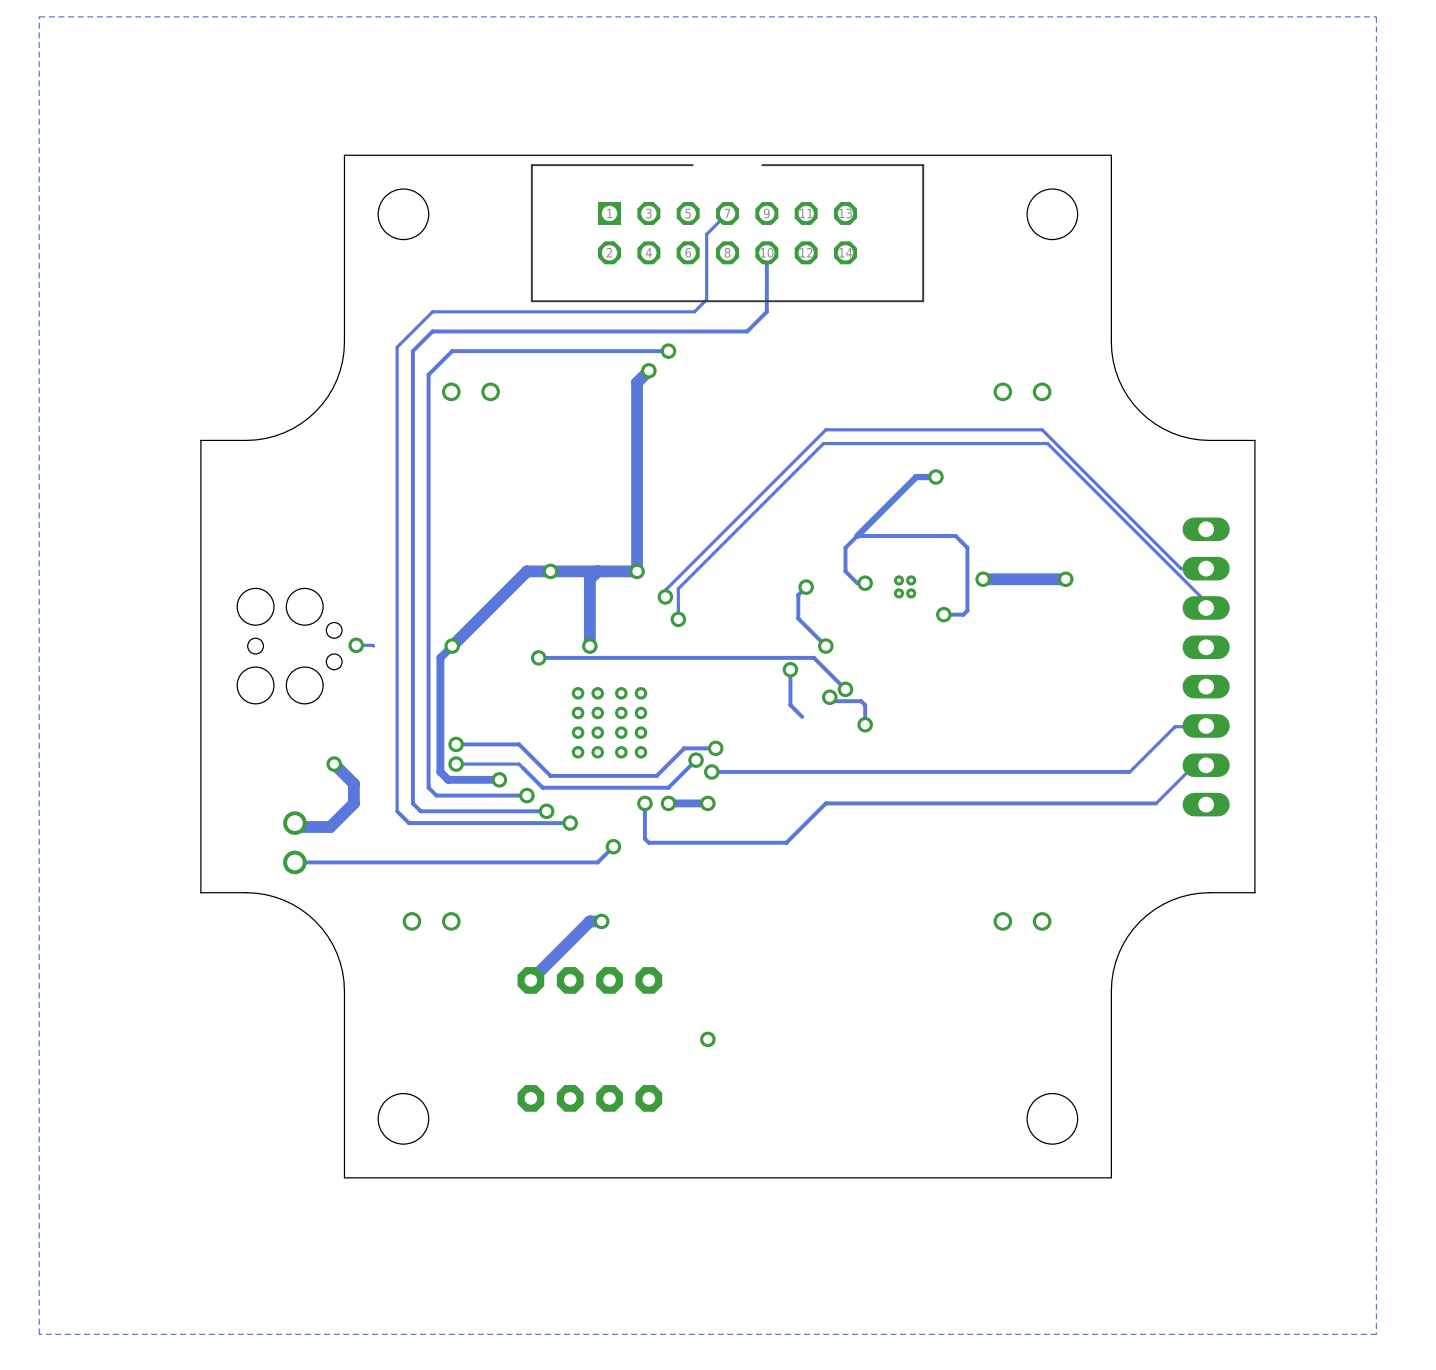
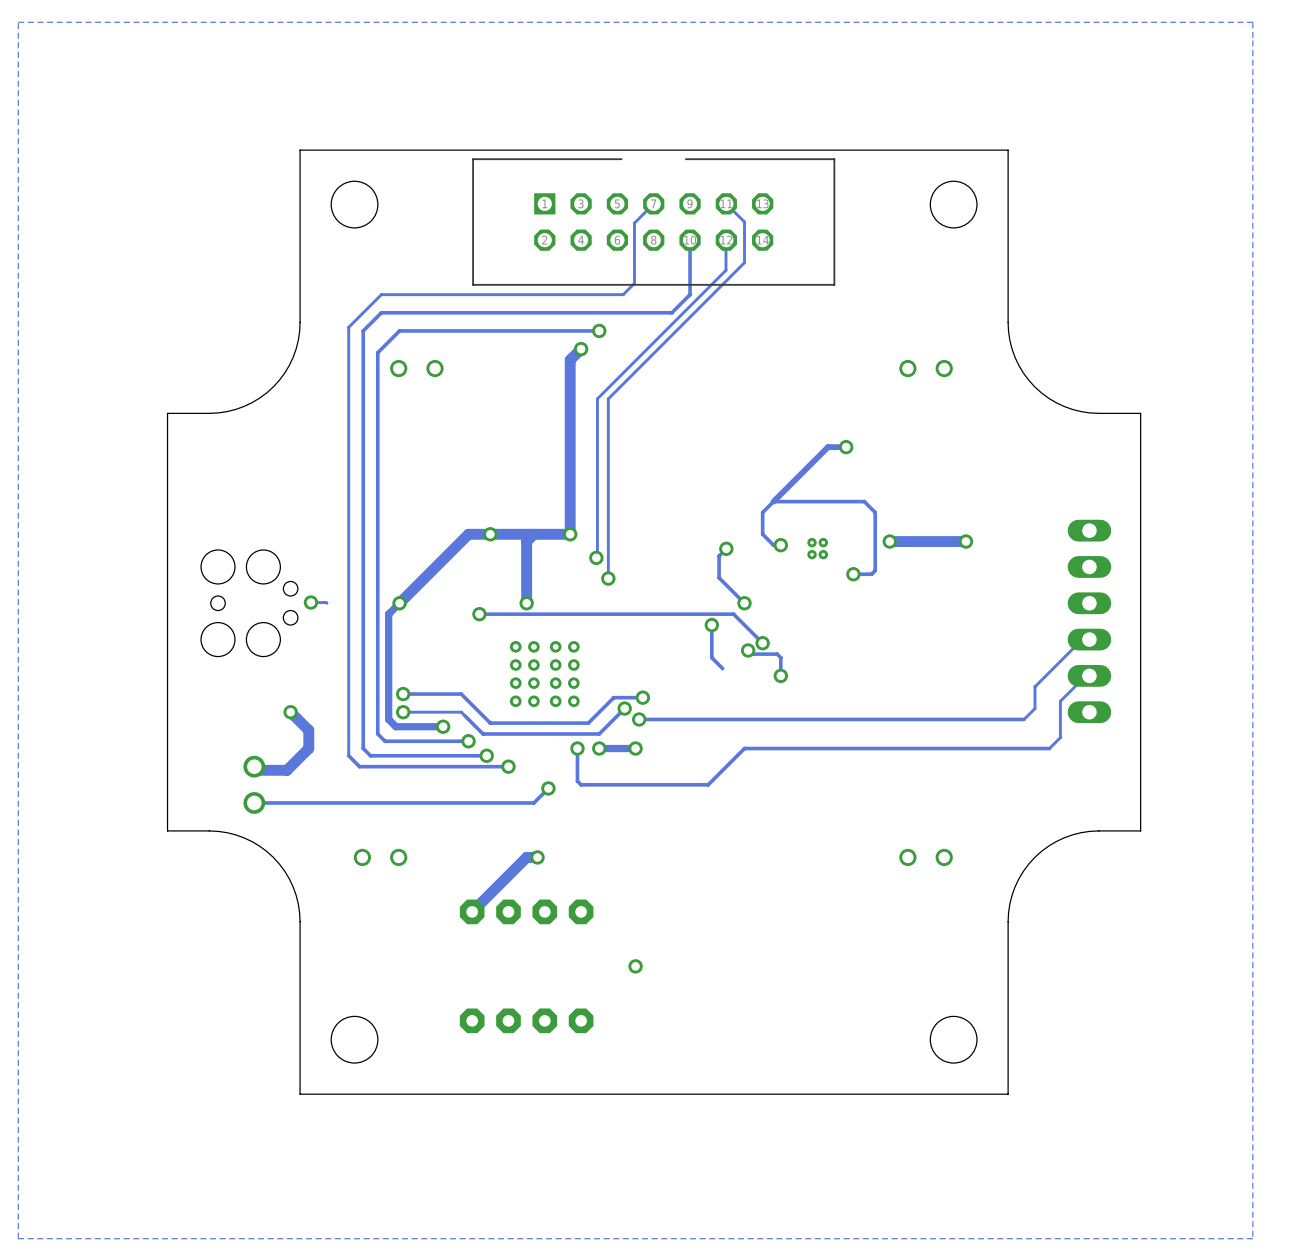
track: none -> (726, 240) (725, 270) (597, 398) (597, 556)
part footprint: [1182, 517, 1230, 817] -> [1067, 519, 1112, 724]
track: (1206, 568) (1180, 568) (1042, 429) (825, 429) (665, 590) (665, 596) -> none
track: (678, 588) (823, 443) (1047, 443) (1206, 602) (1206, 607) -> (608, 550) (608, 398) (744, 262) (744, 222) (726, 203)
track: (1206, 725) (1175, 726) (1128, 771) -> (1089, 639) (1082, 639) (1034, 686) (1034, 708) (1024, 719)
track: (1206, 765) (1194, 765) (1167, 791) -> (1089, 675) (1085, 675) (1060, 701) (1060, 737)

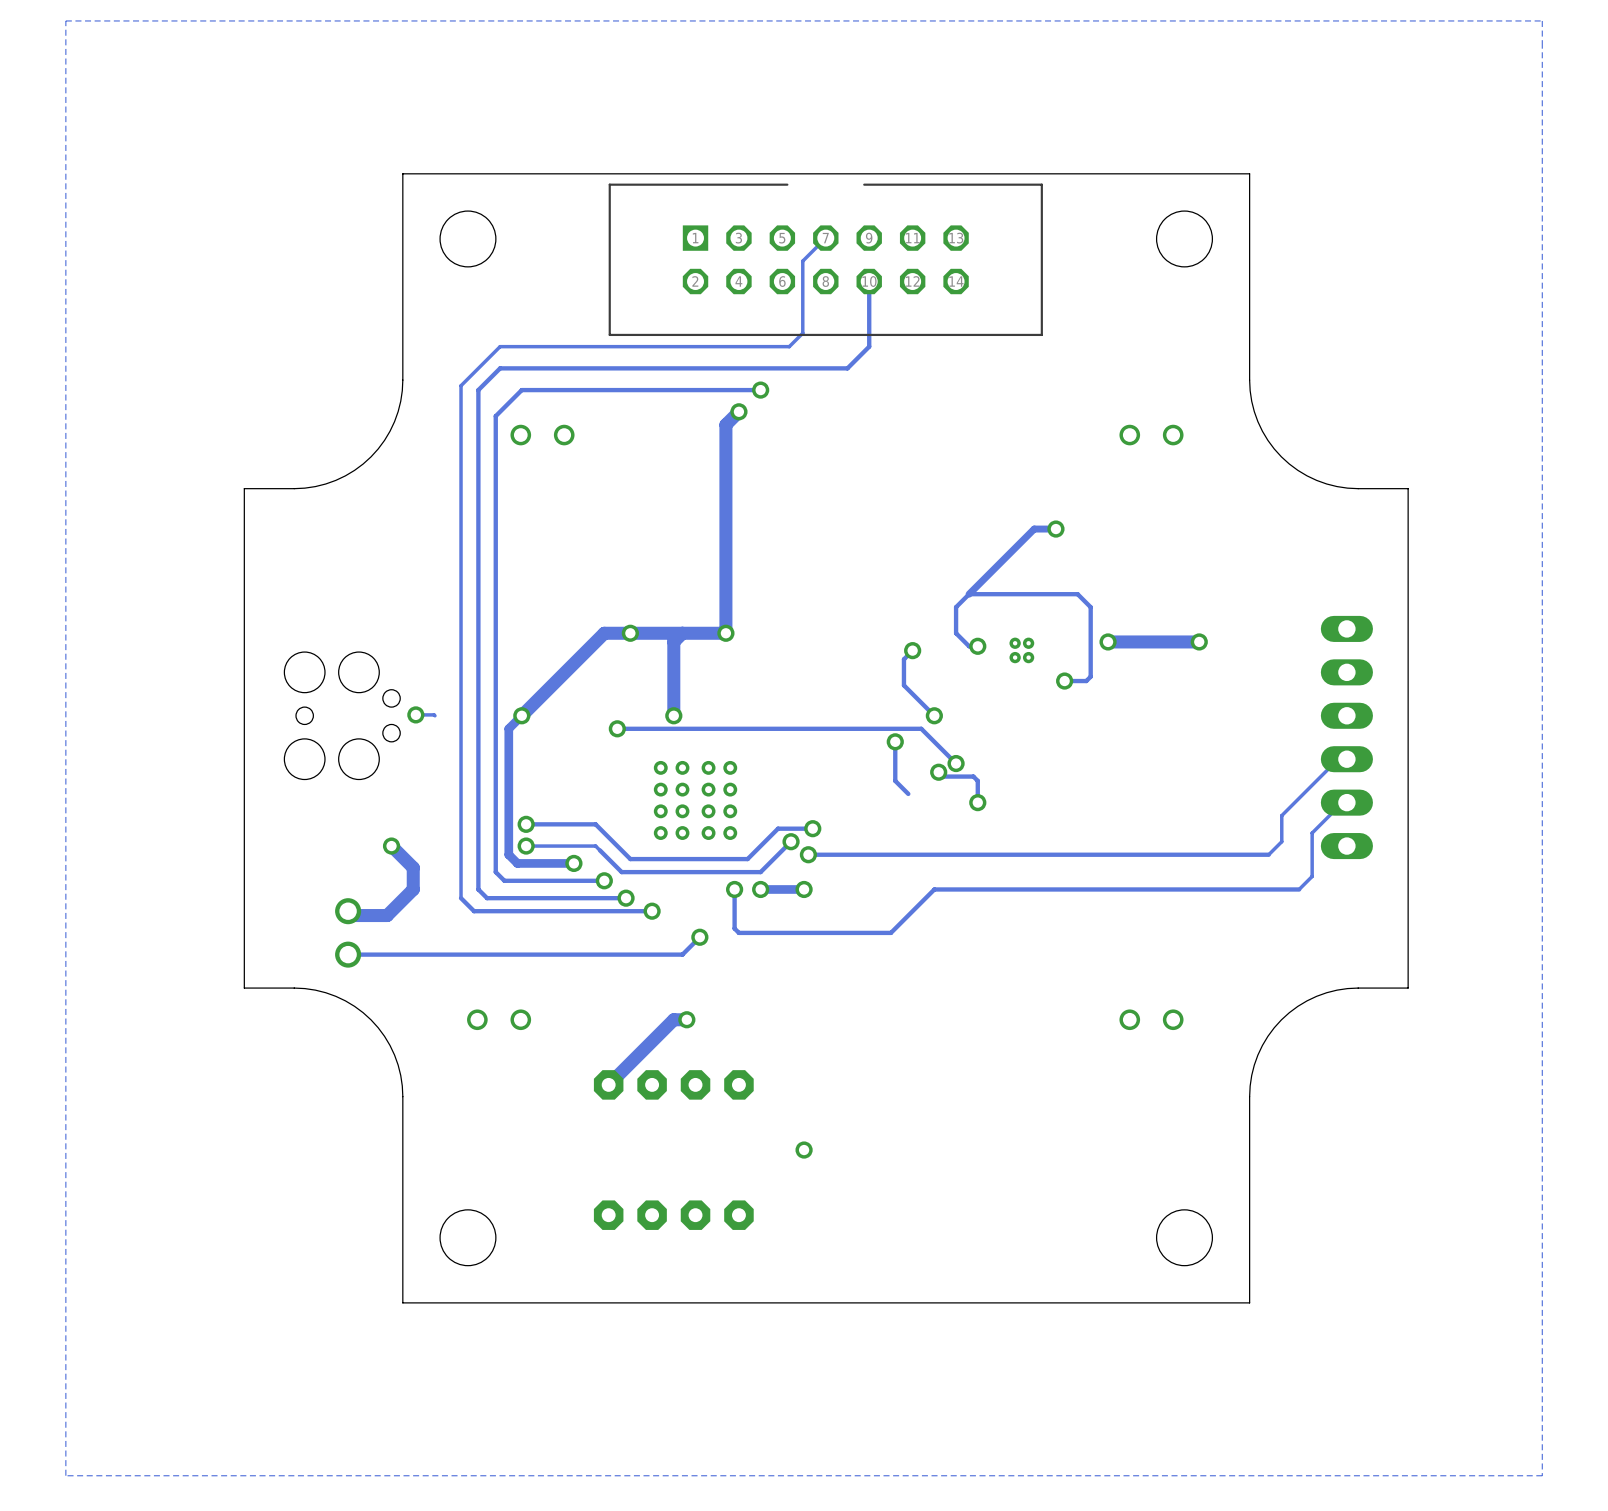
track: (726, 203) (744, 222) (744, 262) (608, 398) (608, 578) -> none
track: (726, 240) (725, 270) (597, 398) (597, 556) -> none
via: (596, 557) -> none
via: (608, 578) -> none

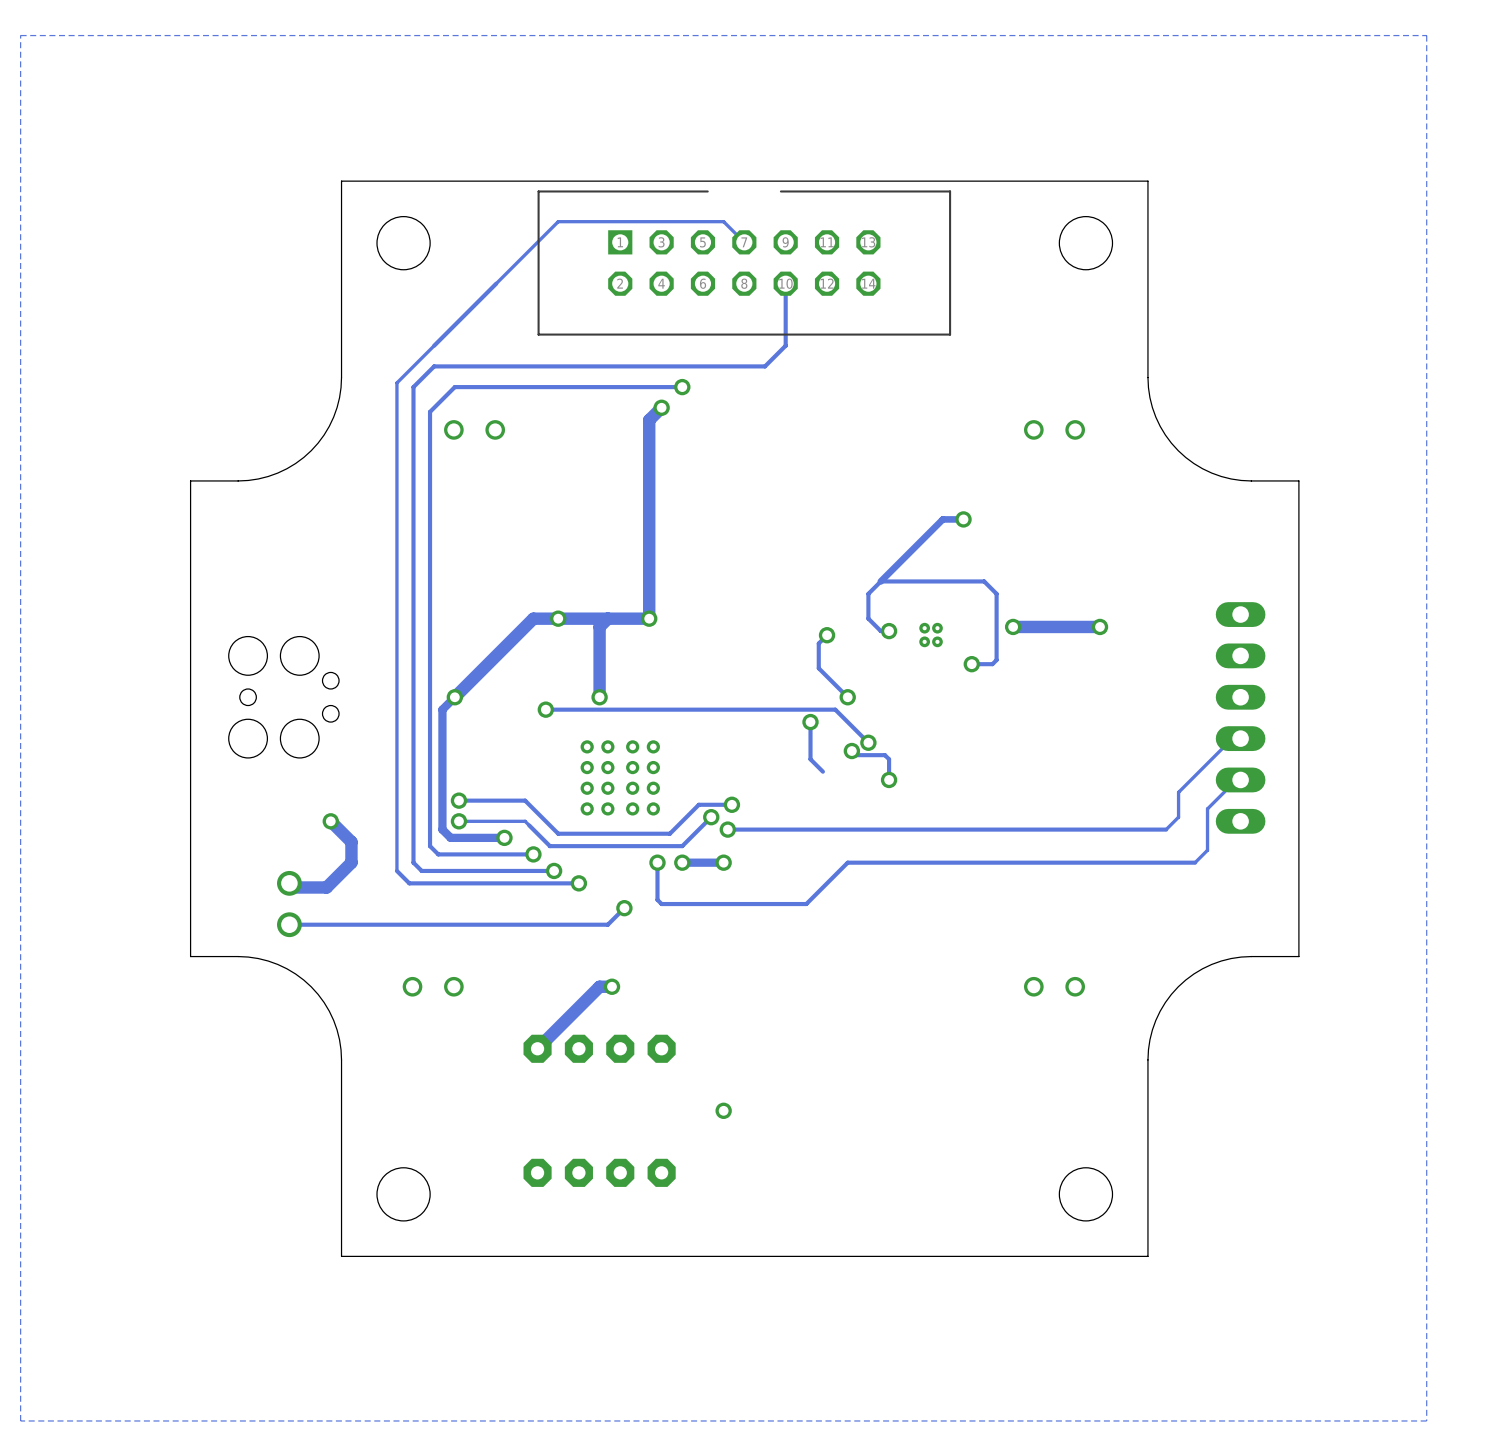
track: (825, 238) (802, 261) (802, 333) (789, 346) (500, 346) -> (744, 242) (723, 221) (558, 221) (434, 345)
track: (415, 714) (434, 715) -> none
via: (415, 714) -> none

